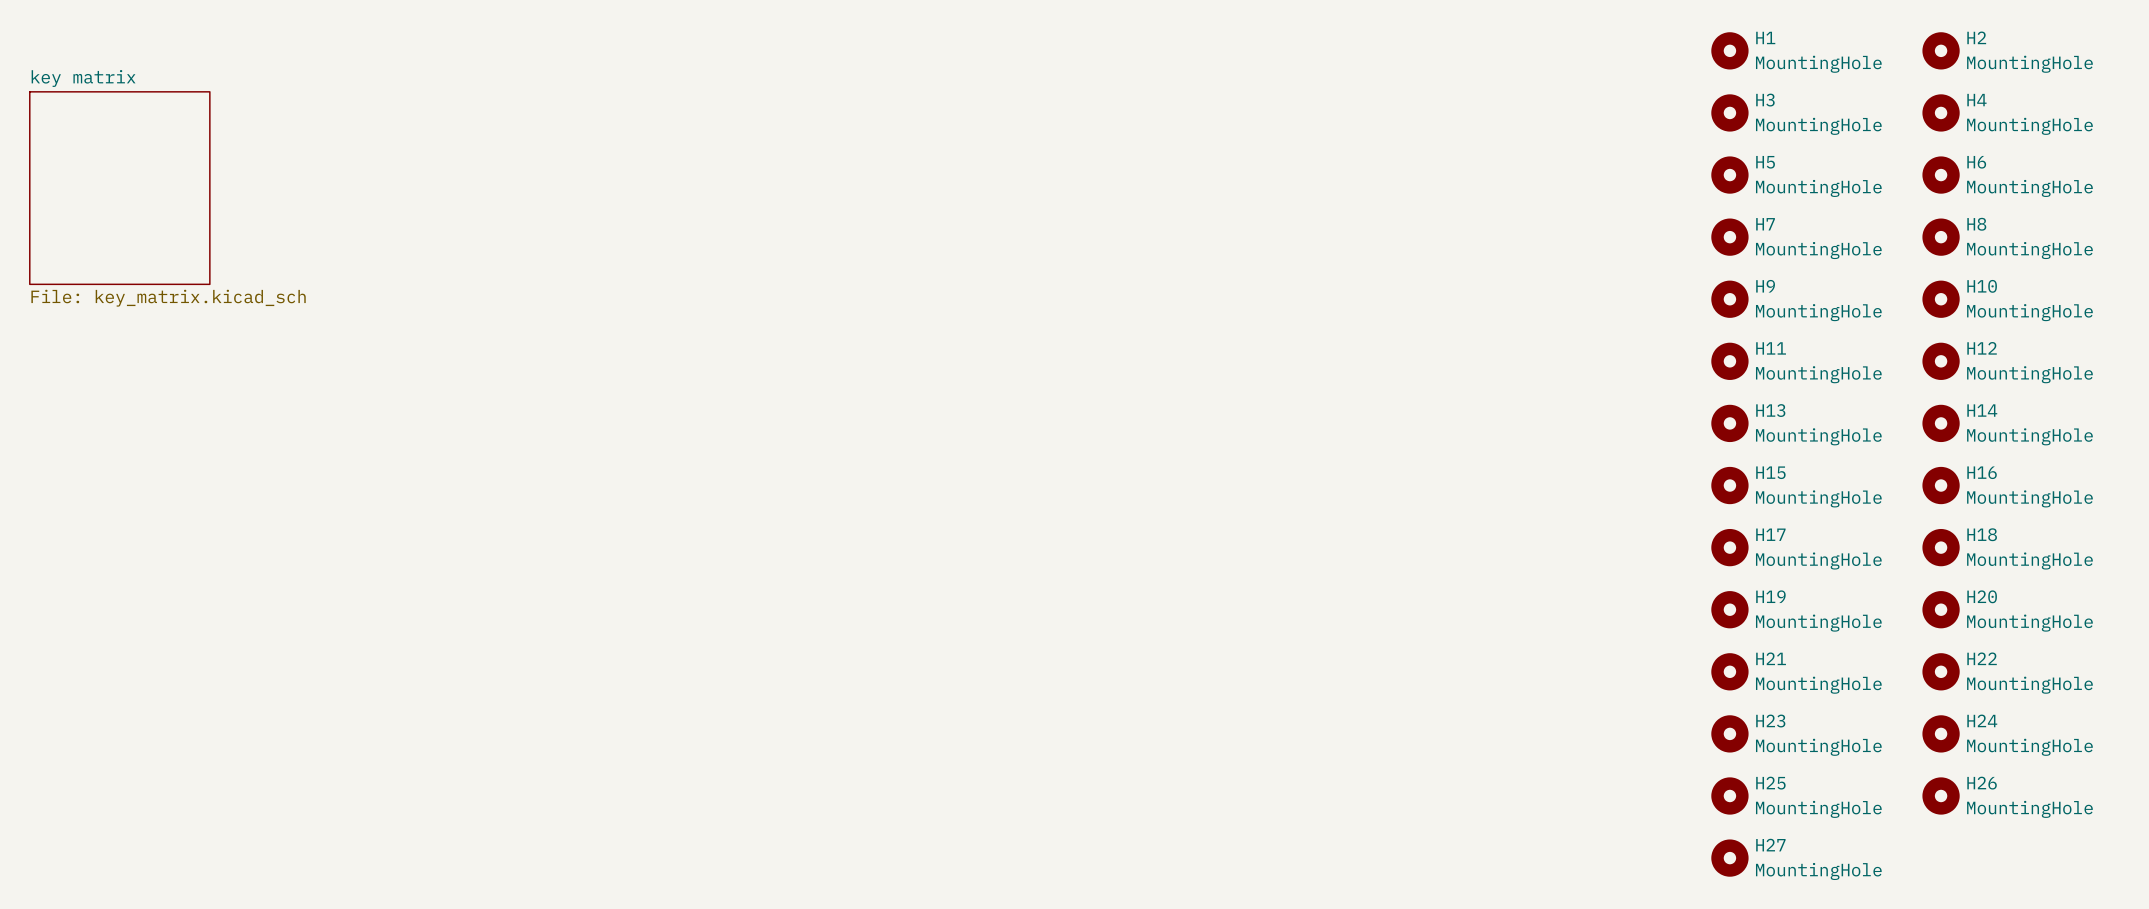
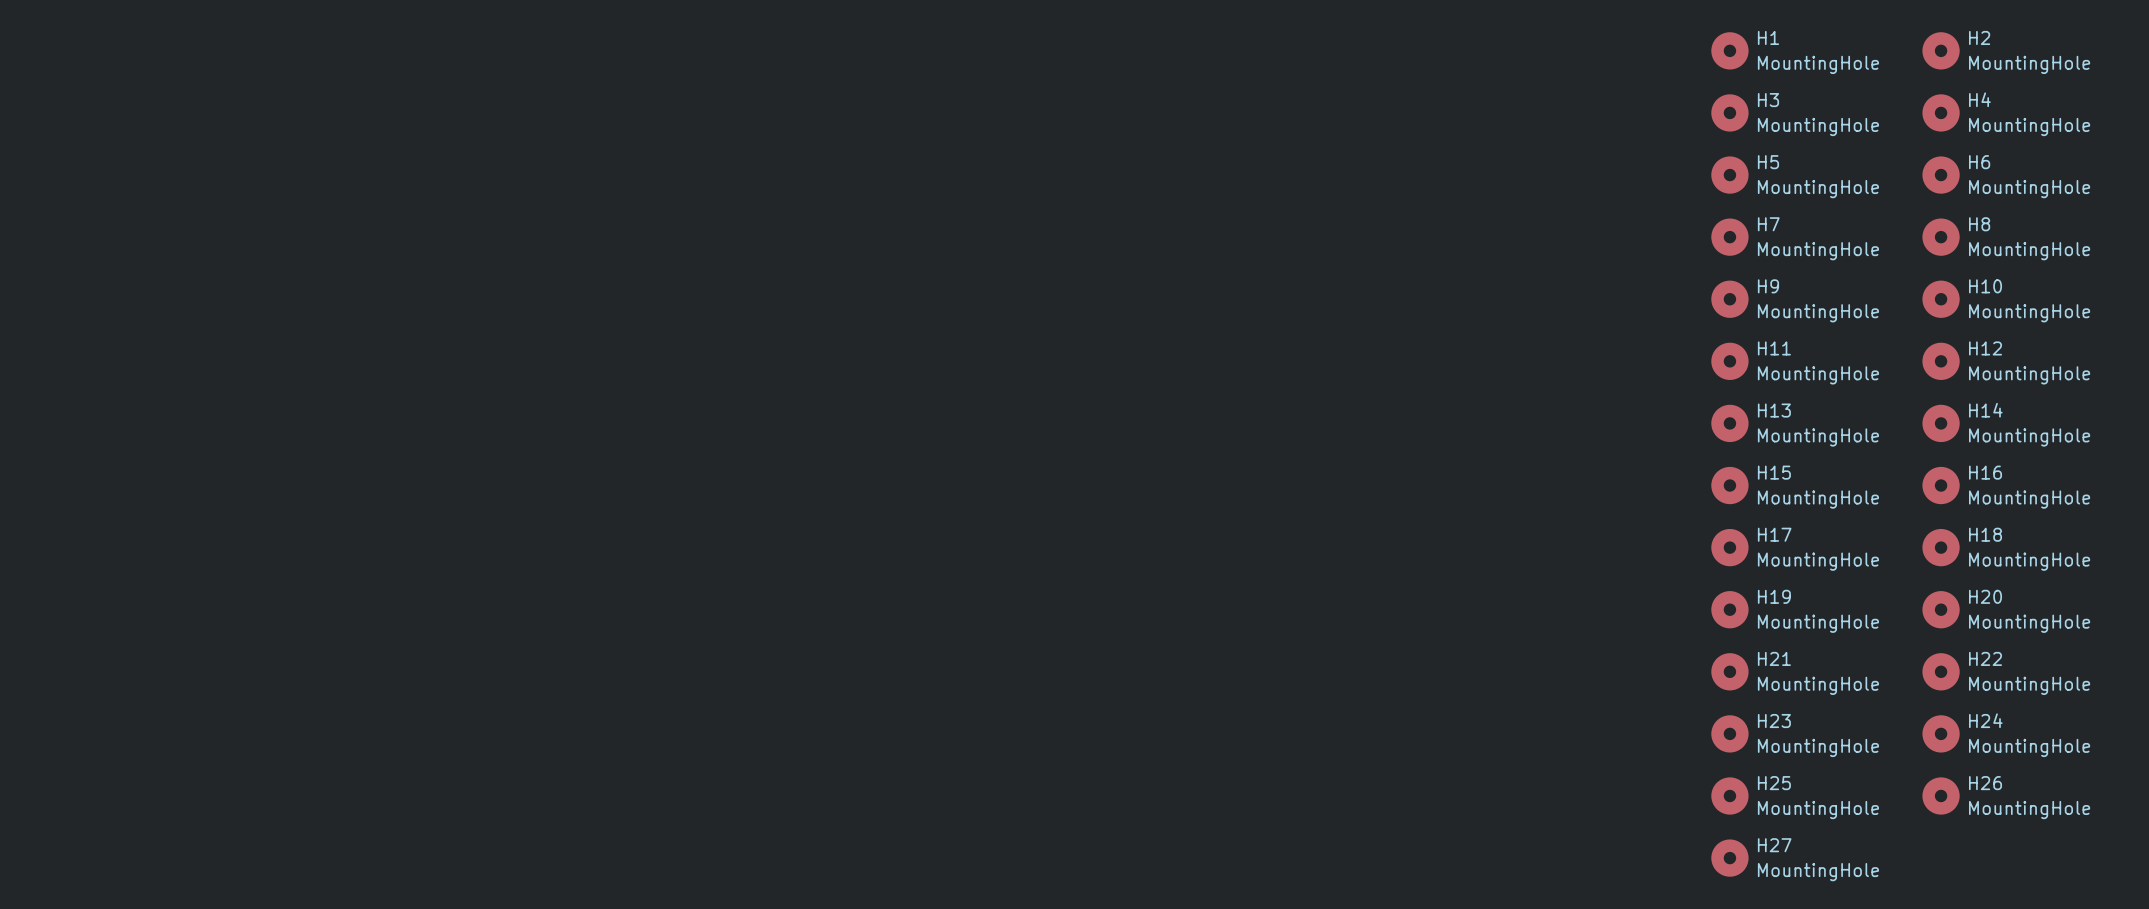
sheet key matrix: File: key_matrix.kicad_sch (119, 188) -> none

